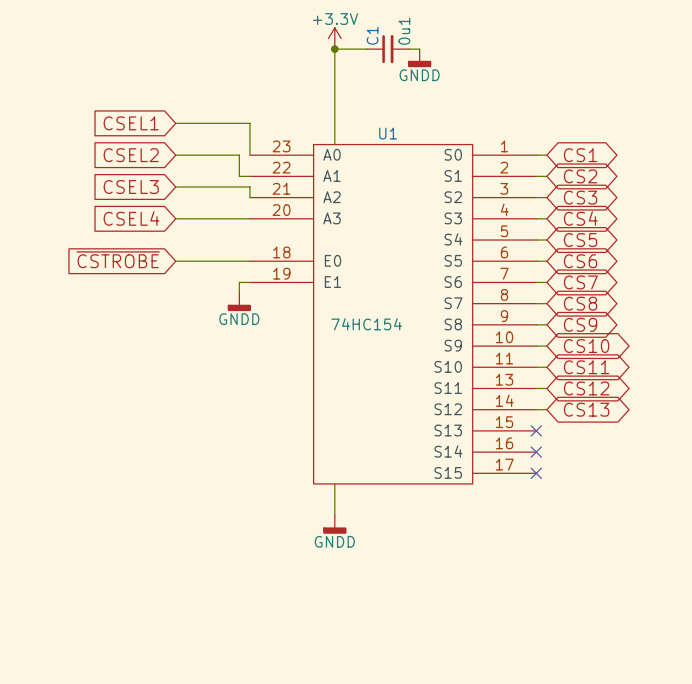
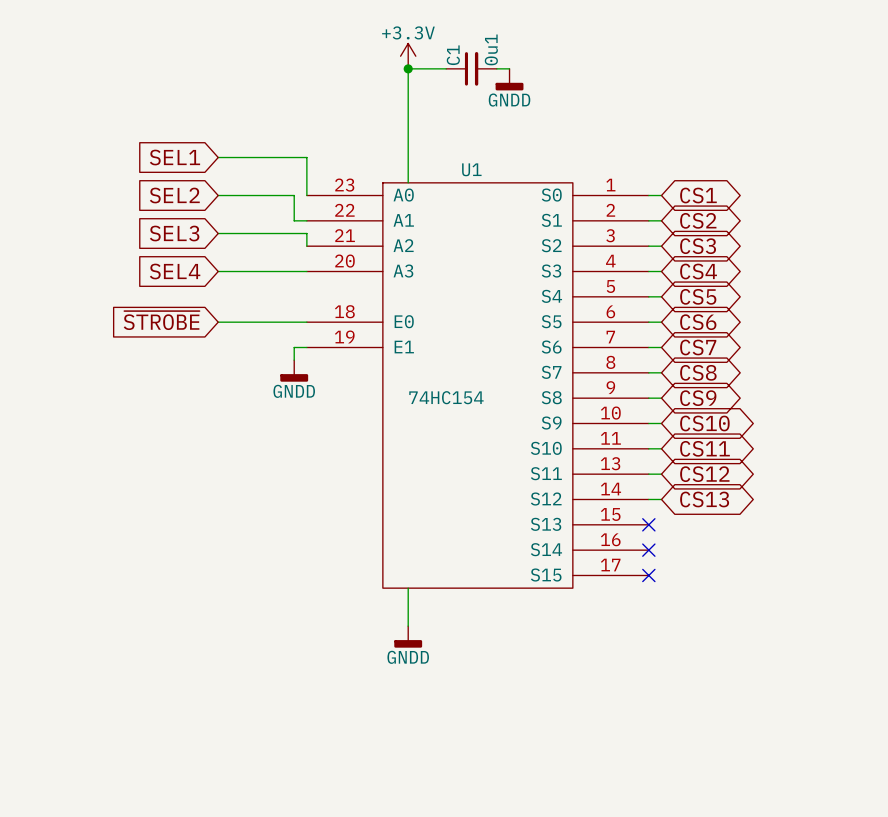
global label: CSEL1 (131, 123) -> SEL1 (174, 157)
global label: CSEL2 (131, 155) -> SEL2 (174, 195)
global label: CSEL3 (131, 186) -> SEL3 (174, 233)
global label: CSEL4 (131, 218) -> SEL4 (175, 271)
global label: ~{CSTROBE} (118, 259) -> ~{STROBE} (161, 320)

